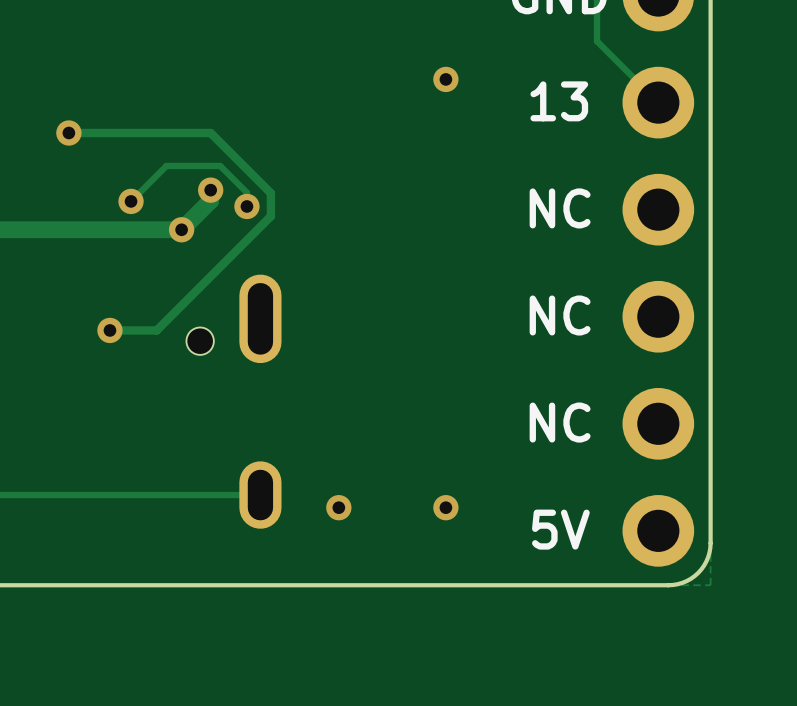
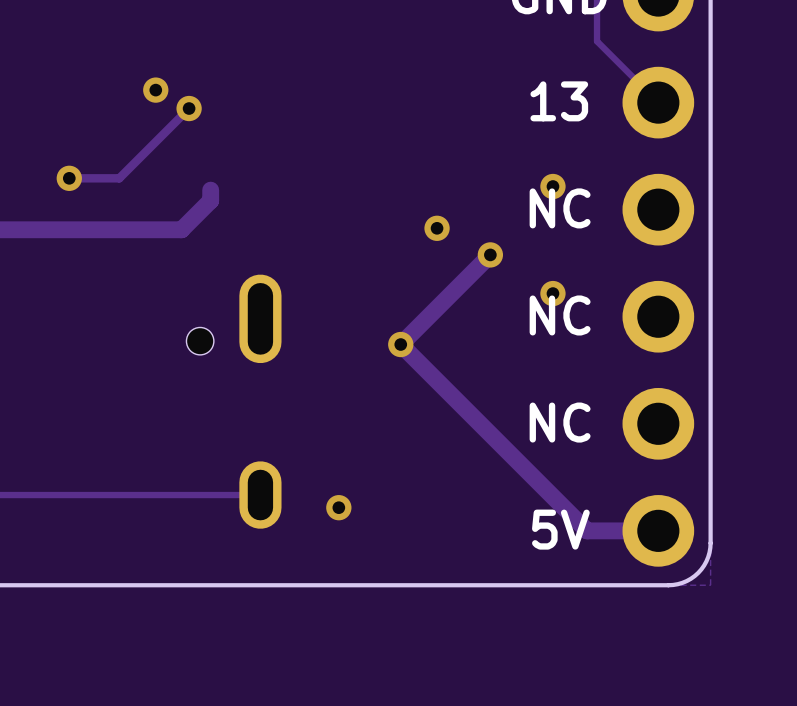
via: (445, 79) -> none
via: none -> (155, 90)
track: none -> (189, 108) (119, 178) (69, 178)
via: none -> (189, 108)
track: (68, 133) (210, 133) (270, 193) (270, 216) (156, 330) (109, 330) -> none
via: (68, 133) -> none
via: none -> (69, 178)
via: none -> (552, 186)
via: (210, 190) -> none
track: (131, 201) (166, 165) (220, 165) (246, 192) (246, 206) -> none
via: (131, 201) -> none
via: (246, 206) -> none
via: none -> (437, 228)
via: (181, 229) -> none
track: none -> (490, 254) (400, 344) (587, 530) (658, 530)
via: none -> (490, 254)
via: none -> (552, 293)
via: (109, 330) -> none
via: none -> (400, 344)
via: (445, 507) -> none

